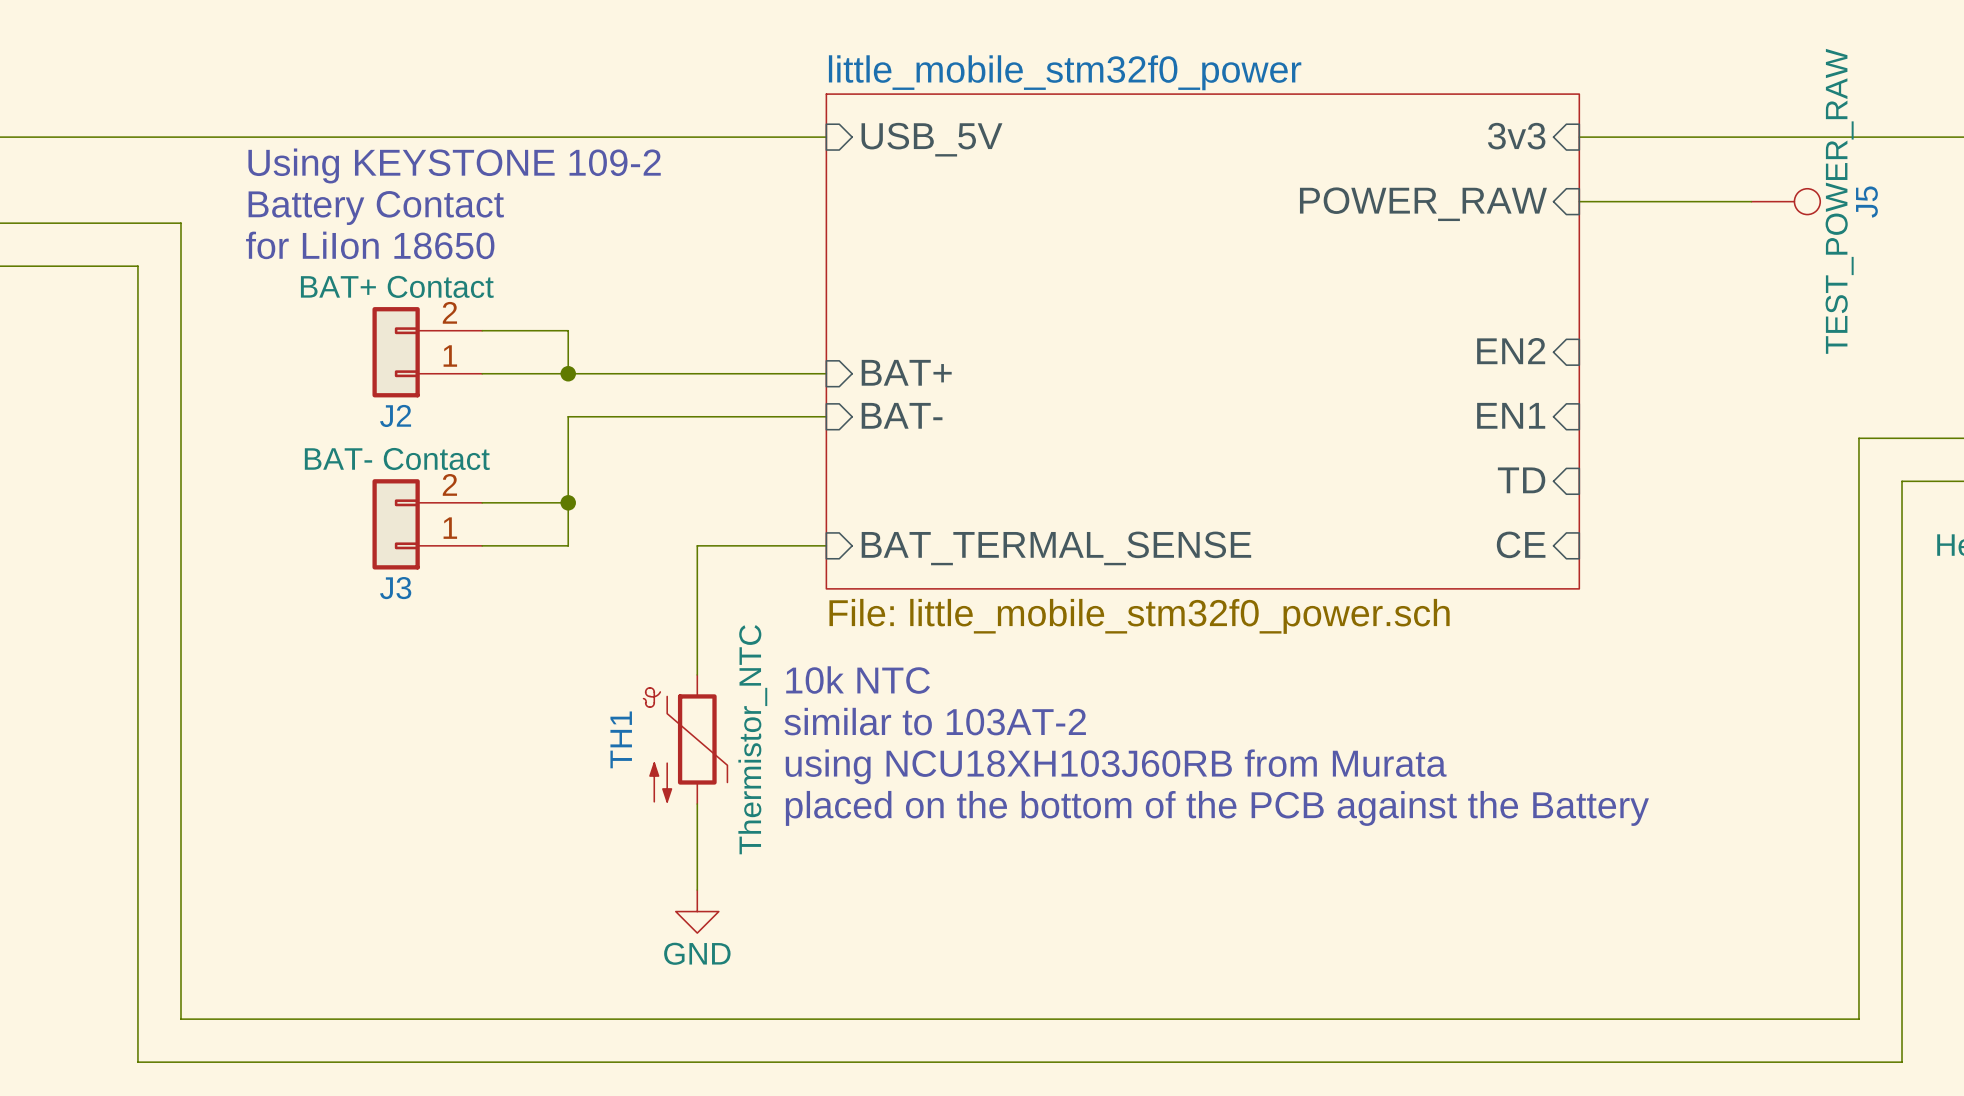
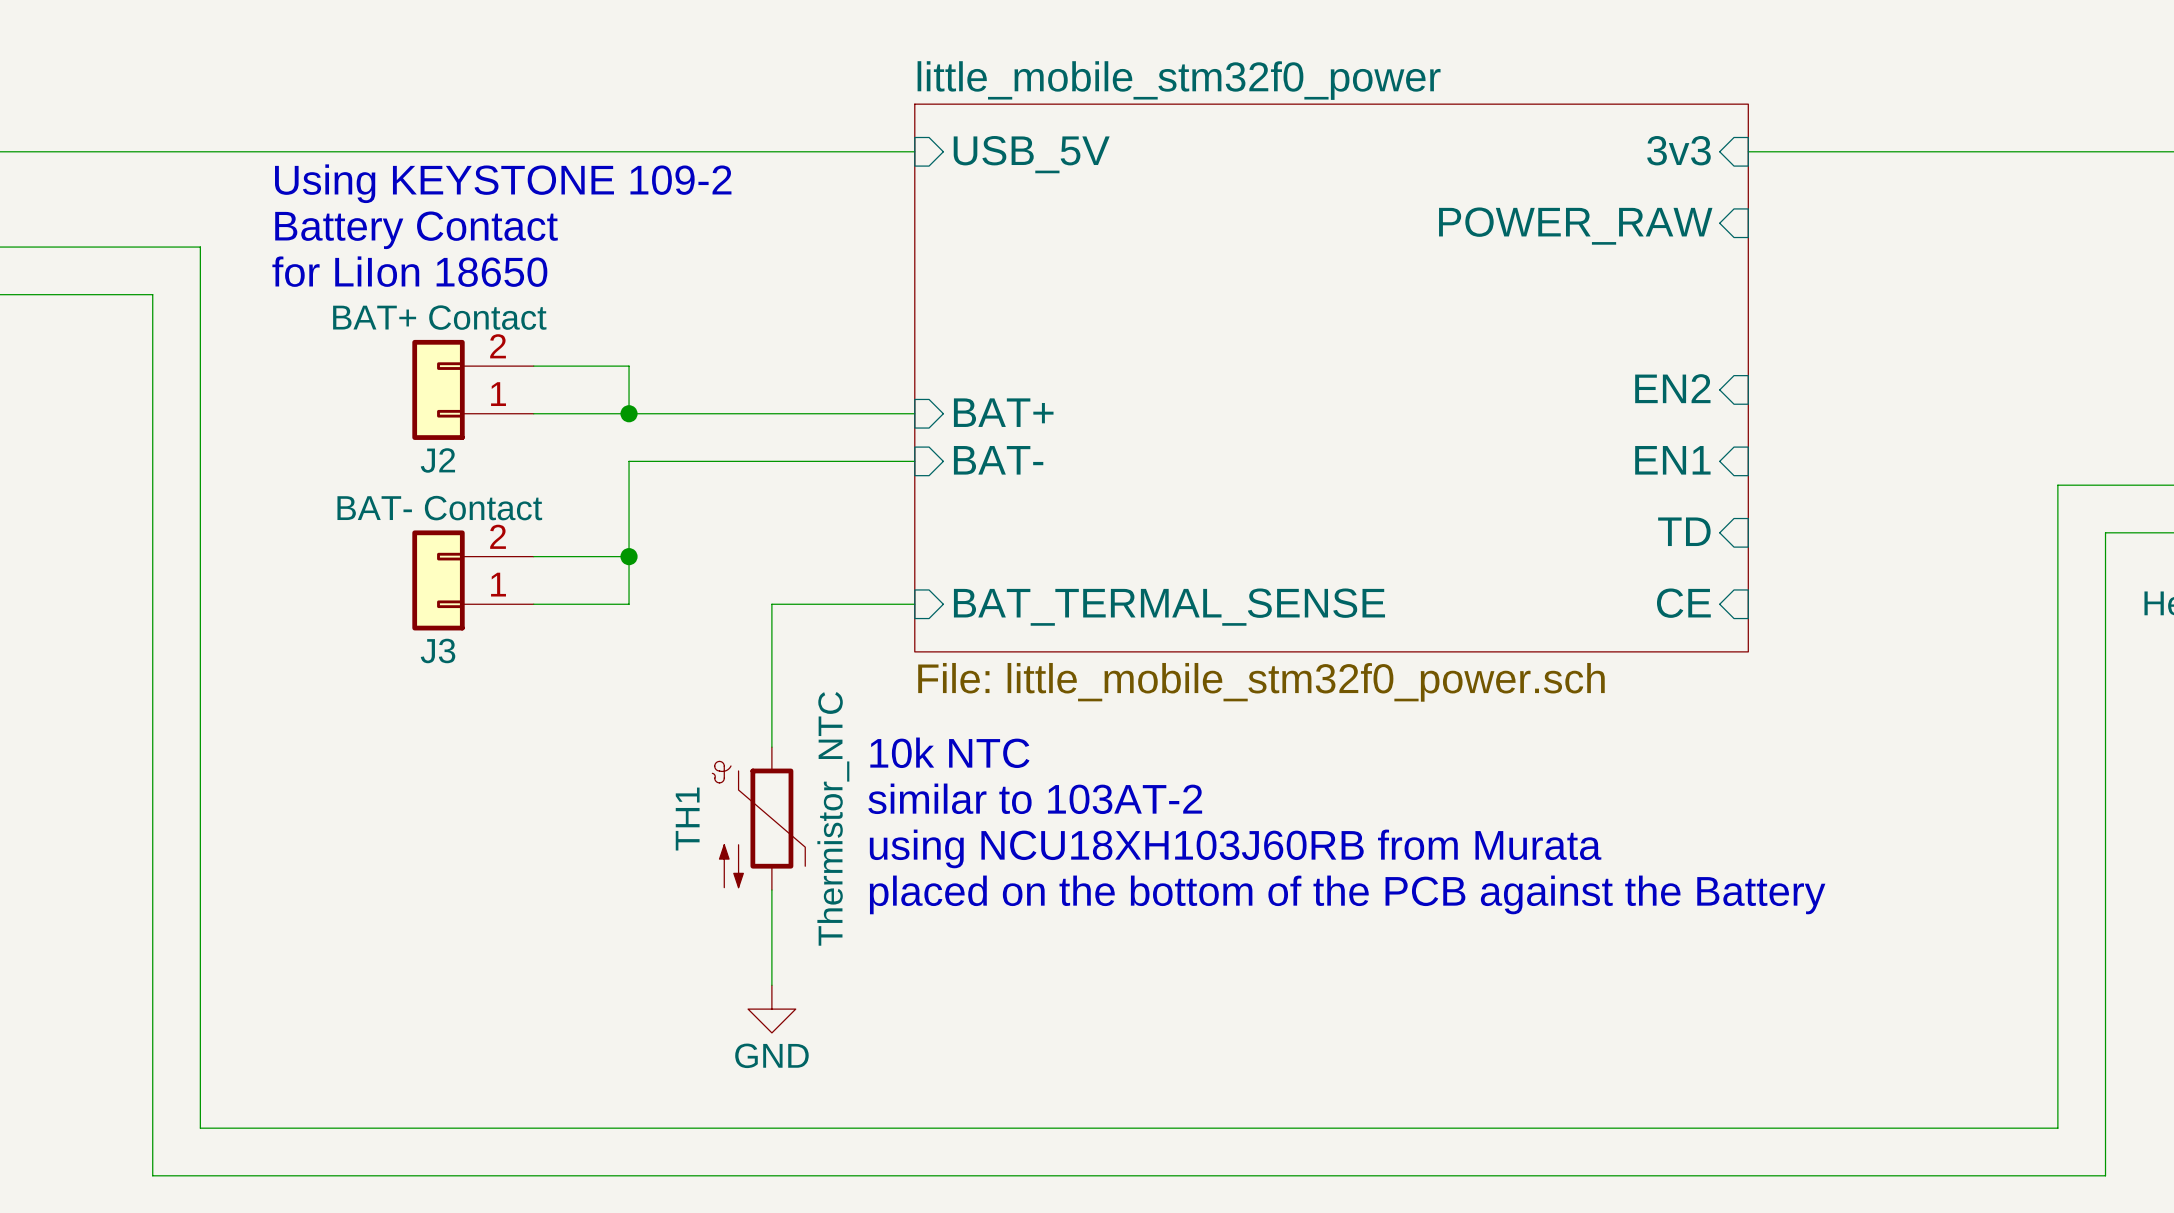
wire: (1579, 201) (1751, 201) -> none
J5: TEST_POWER_RAW (1785, 201) -> none

